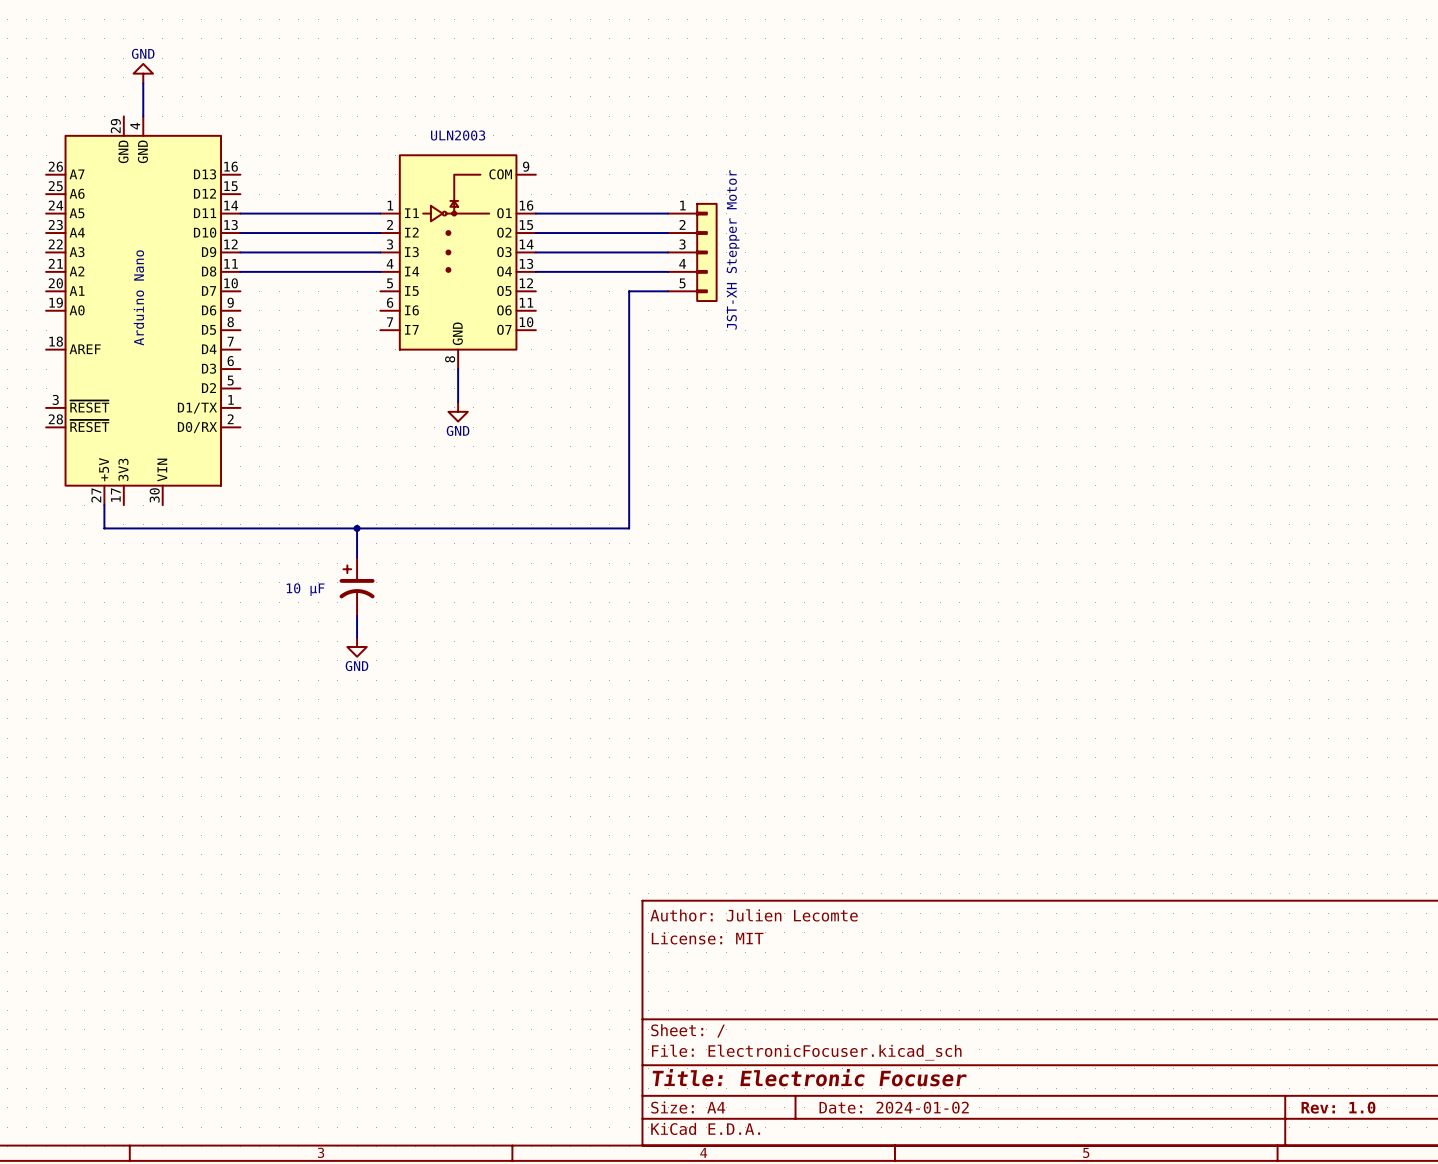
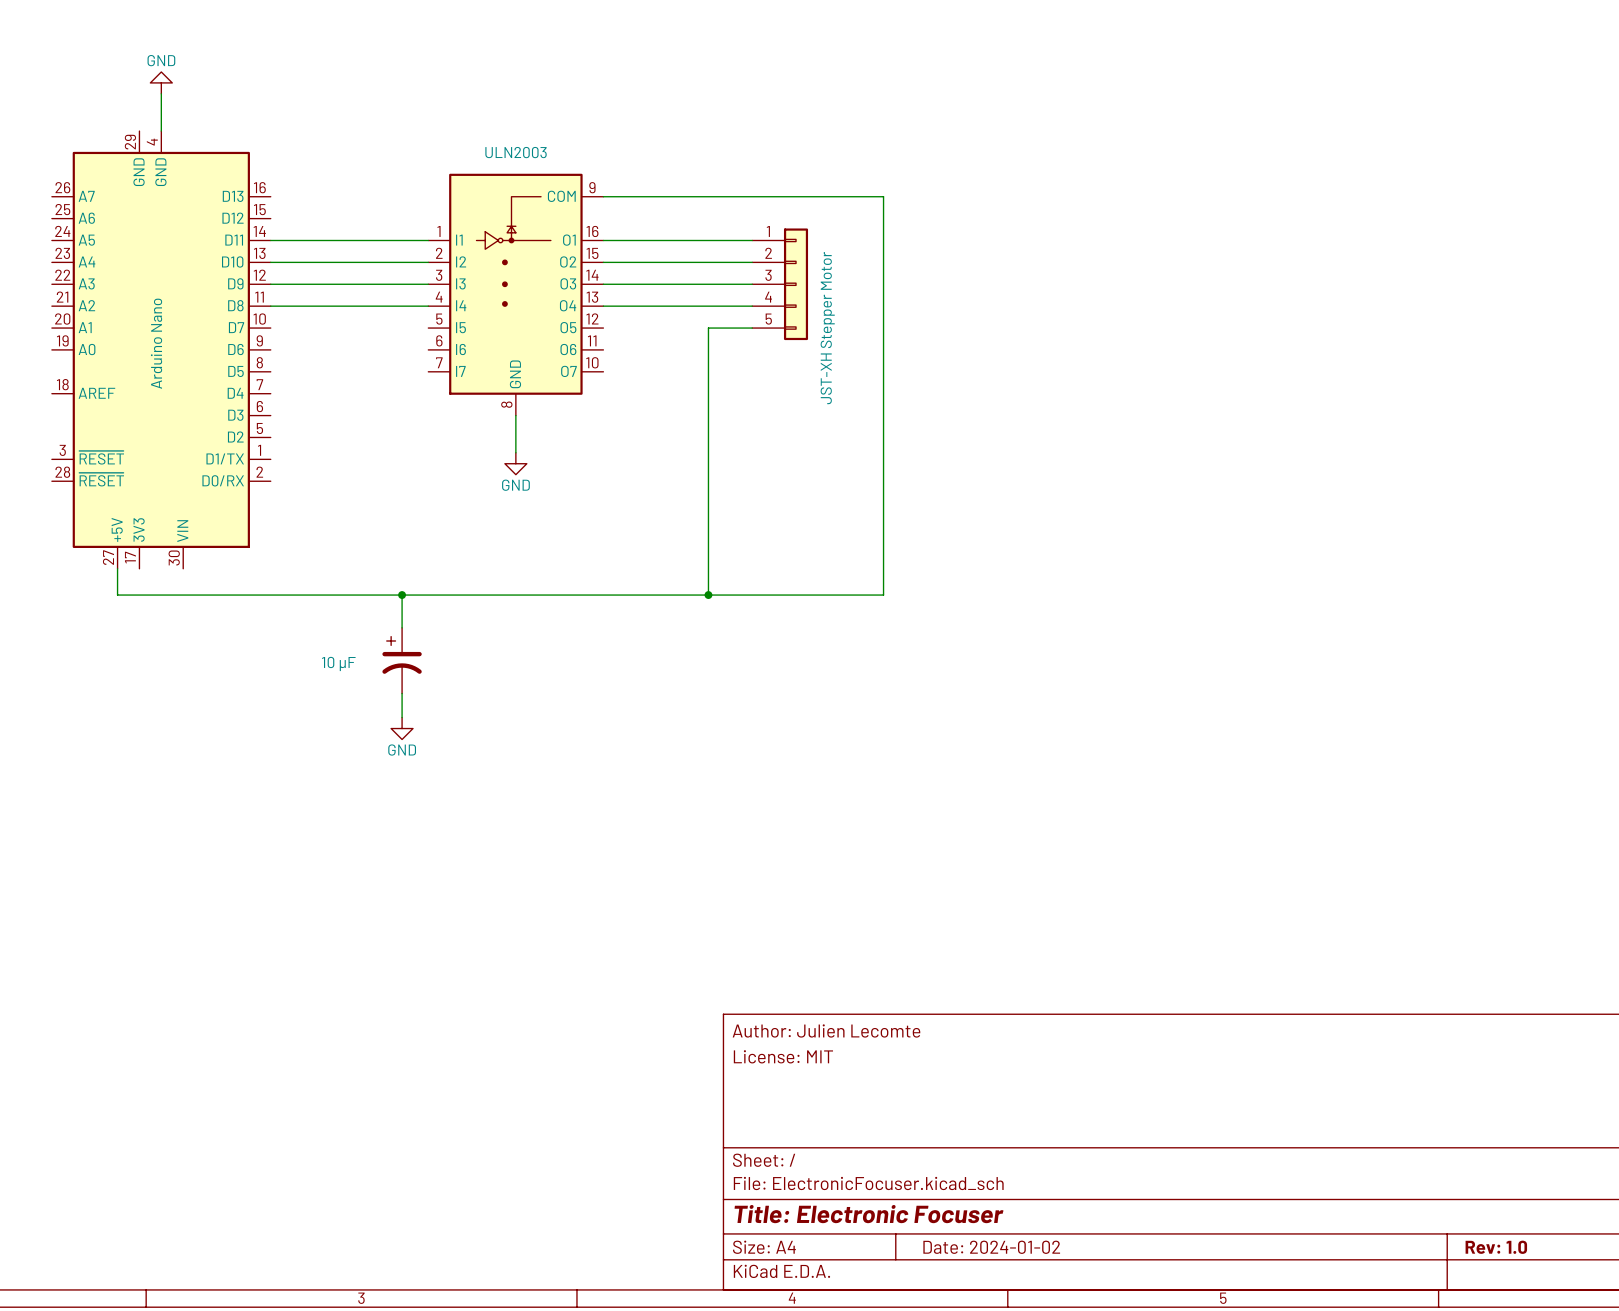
wire: none -> (603, 196) (883, 196) (883, 595) (708, 595)
part value position: JST-XH Stepper Motor (733, 249) -> JST-XH Stepper Motor (827, 328)
junction: none -> (708, 595)

